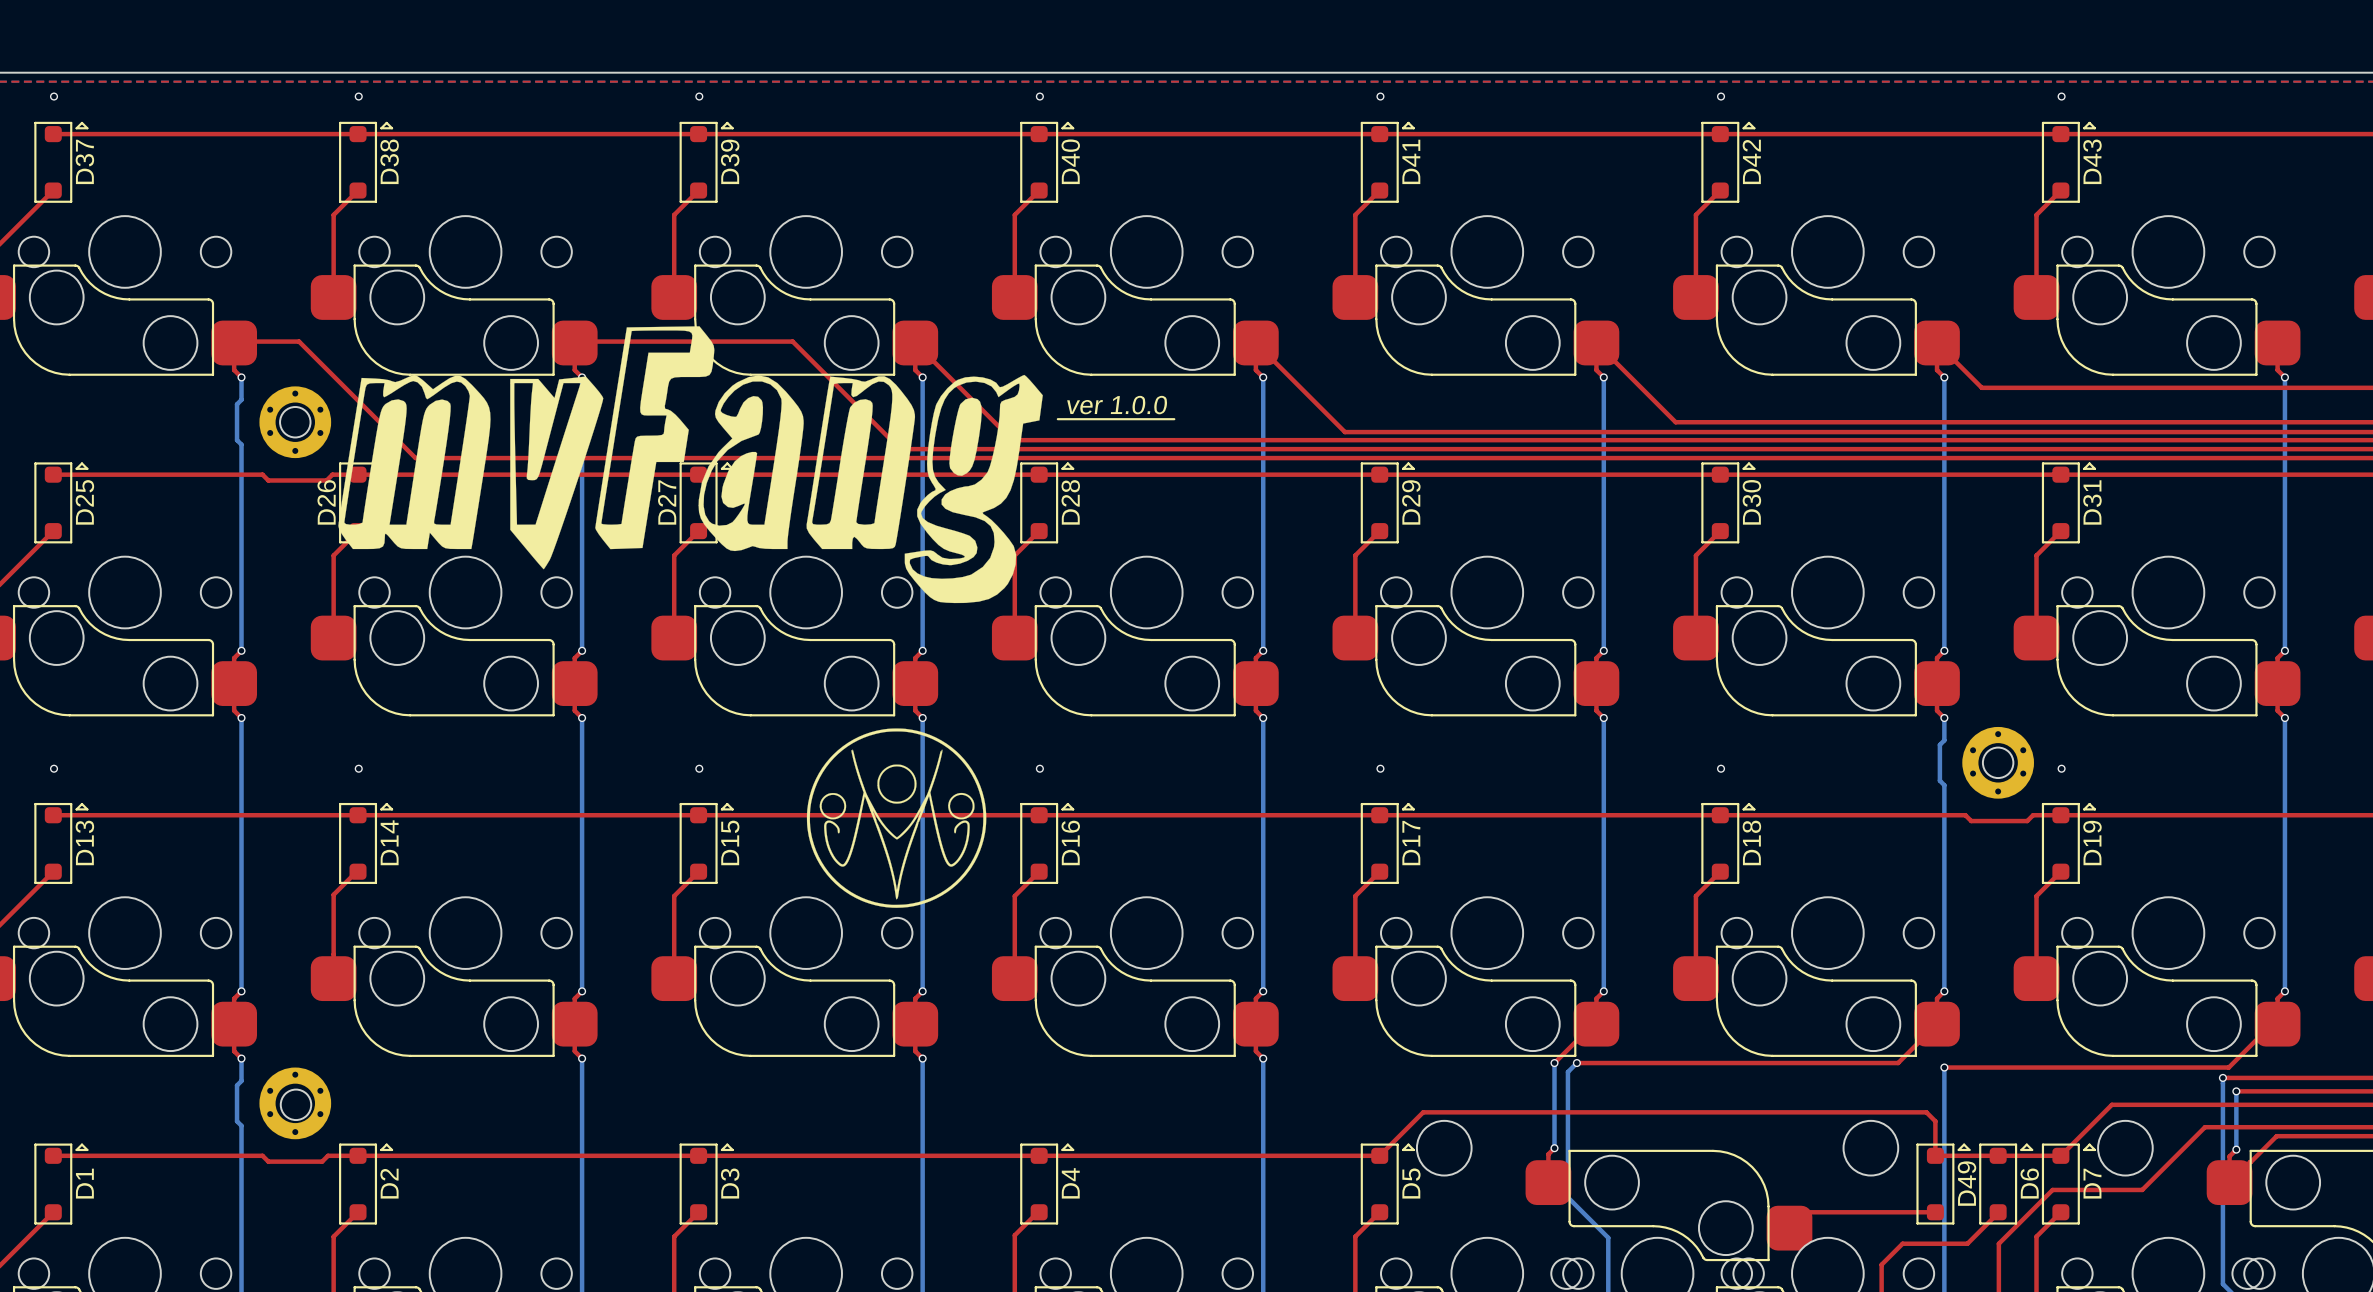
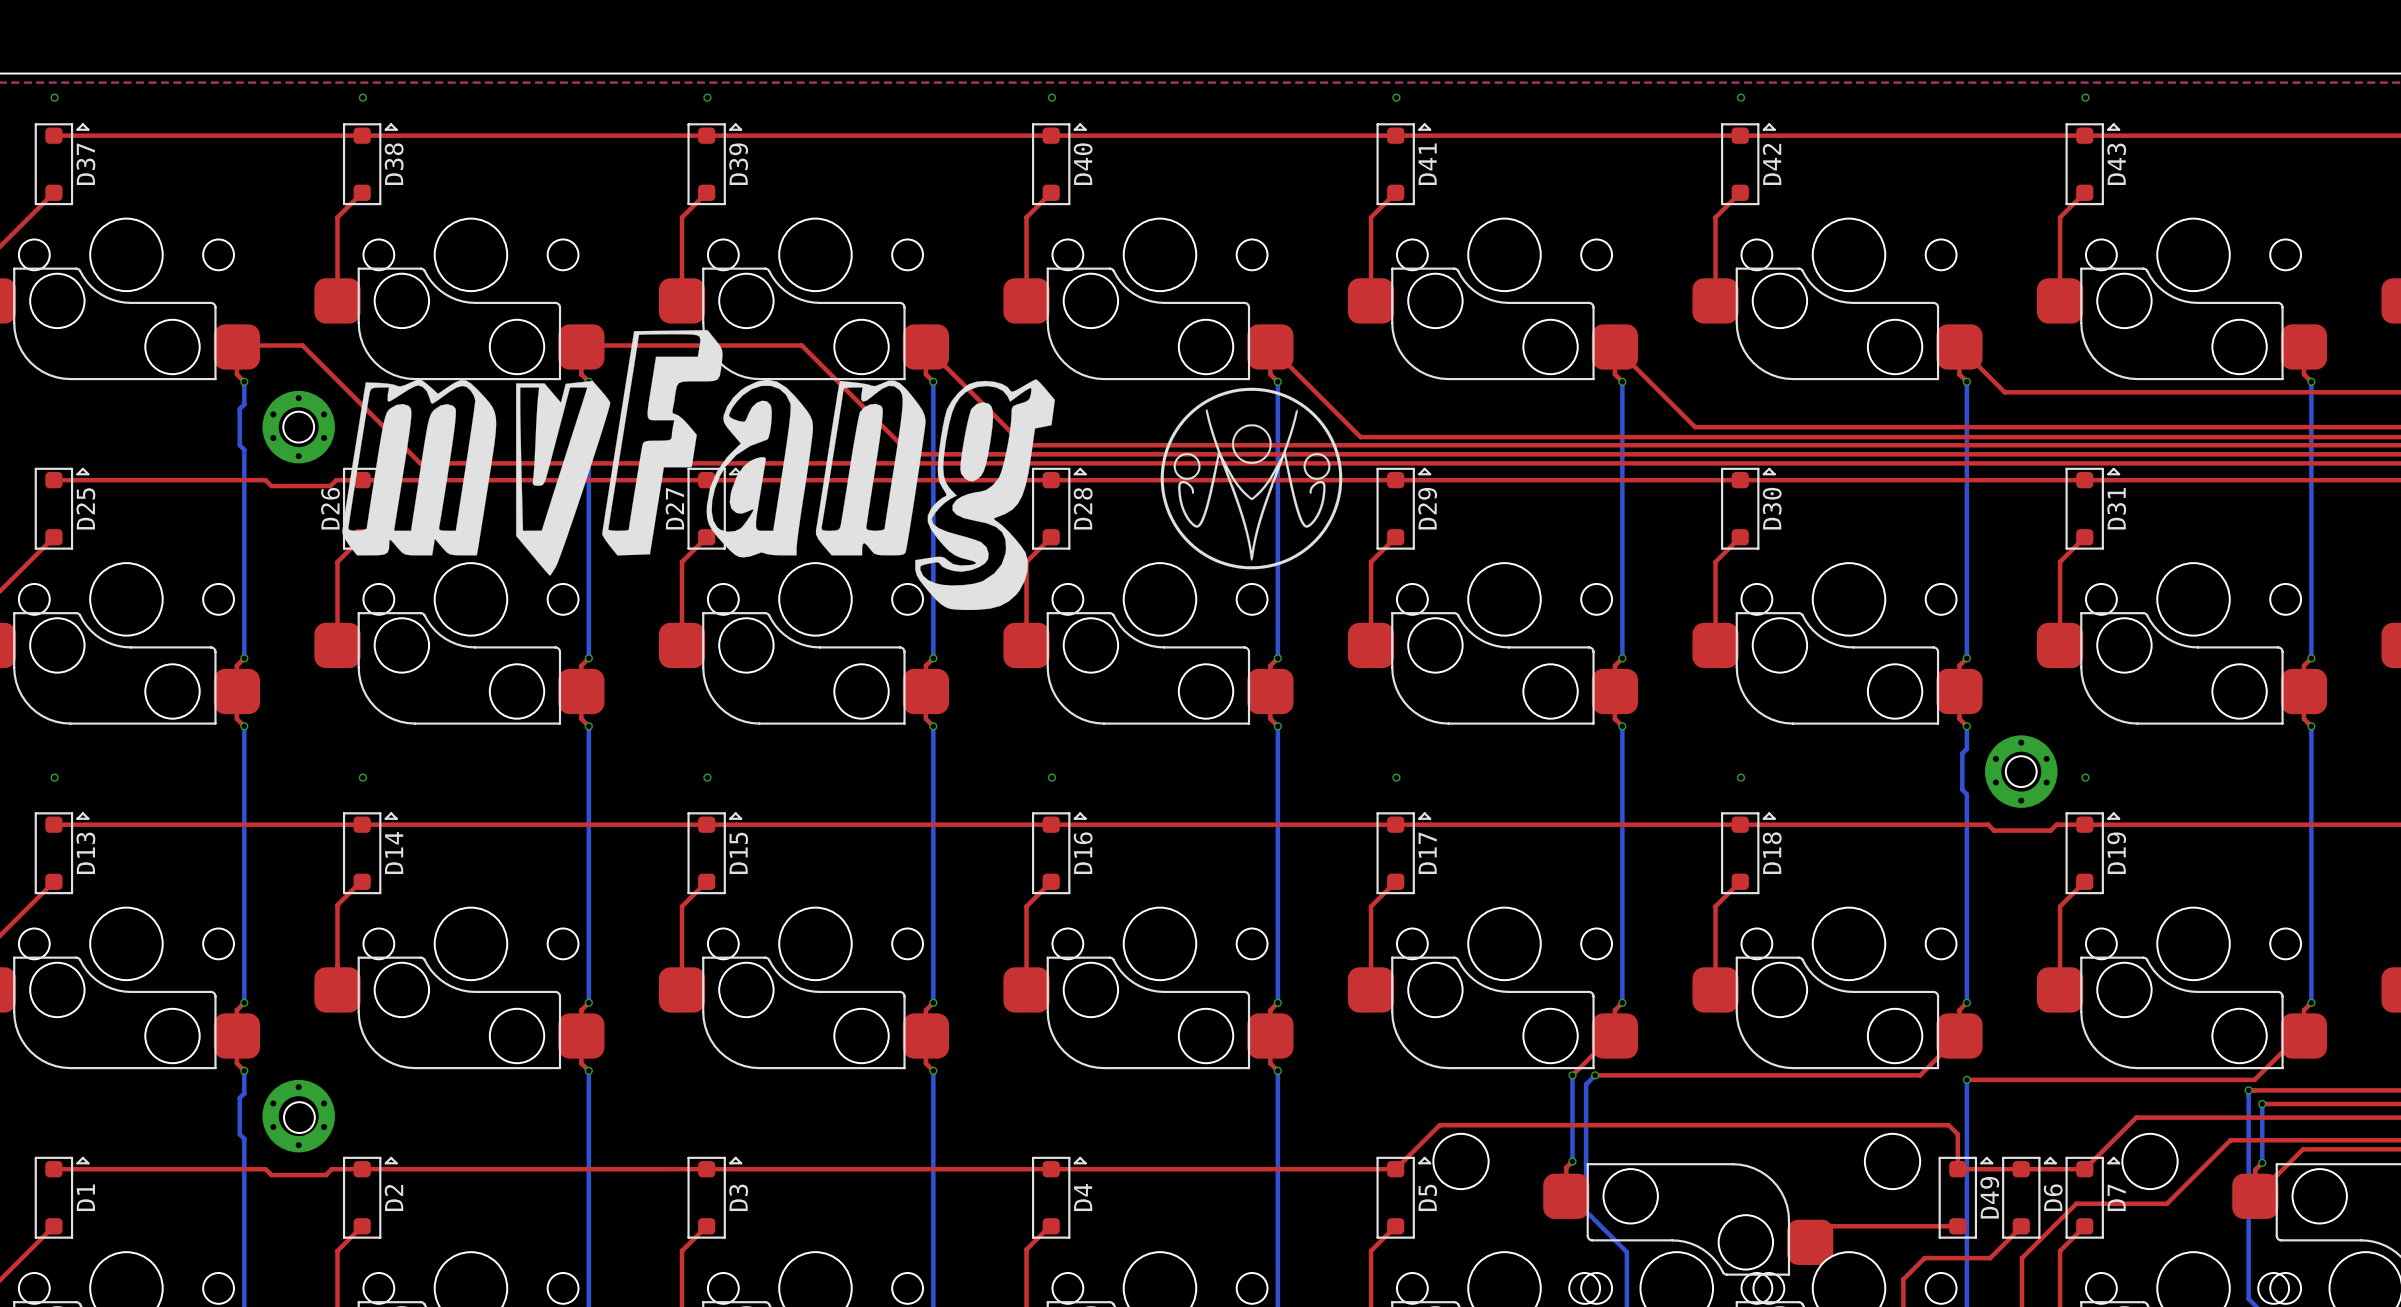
drawing: none -> [1160, 387, 1343, 570]
text: ver 1.0.0 (1117, 405) -> none
line: (1057, 419) (1174, 419) -> none
drawing: [806, 728, 987, 908] -> none

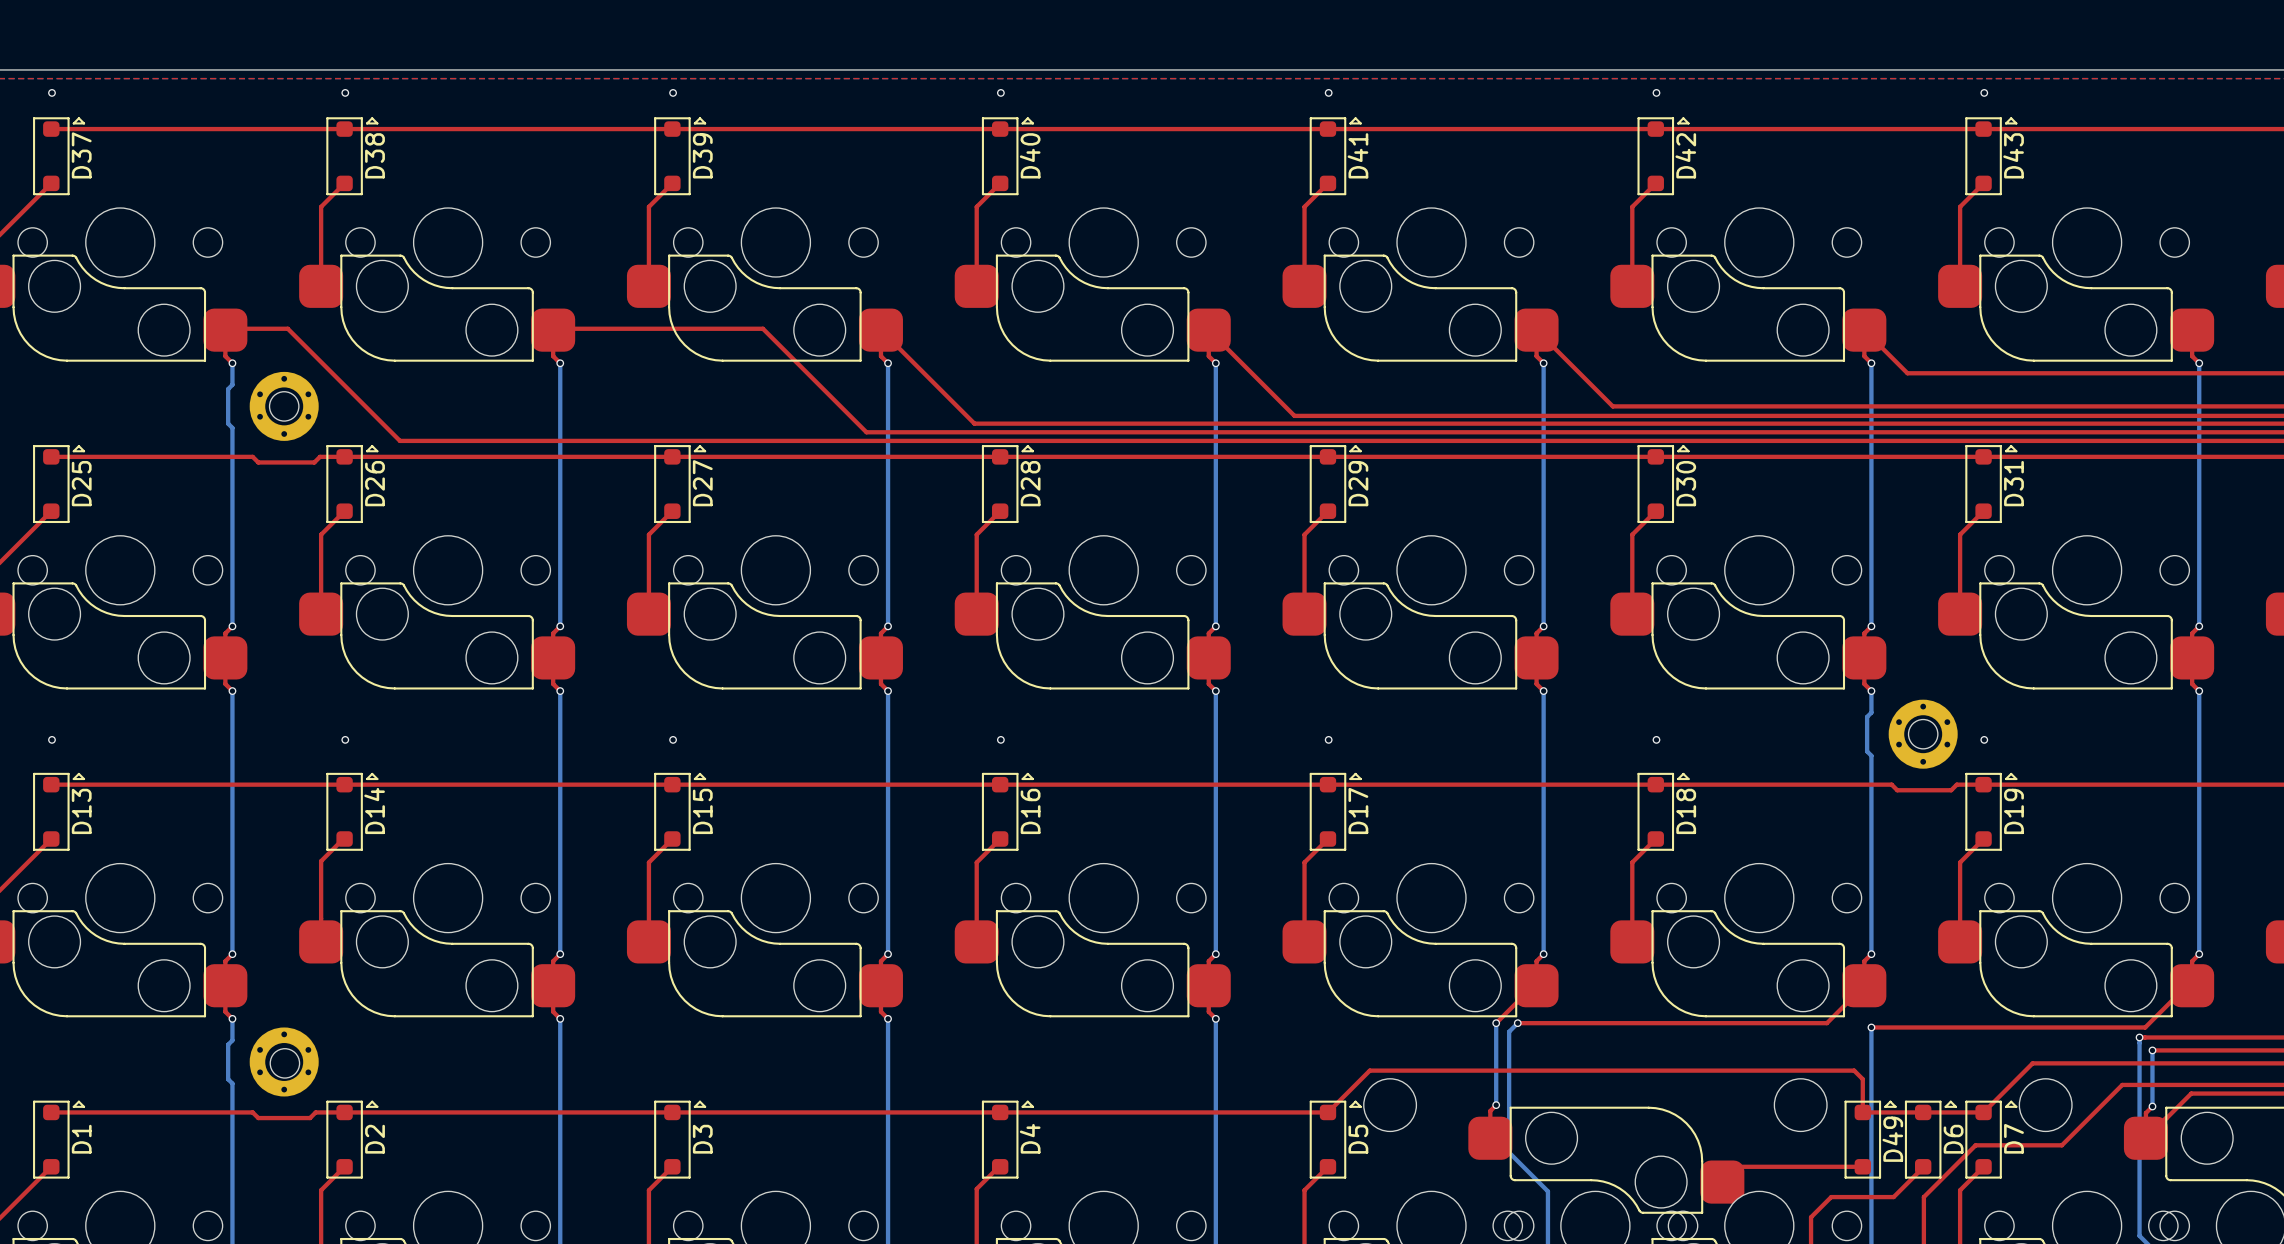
drawing: [342, 330, 1055, 611] -> none
drawing: [1160, 387, 1343, 570] -> none
D26 name position: D26 (330, 508) -> D26 (375, 483)
D27 name position: D27 (674, 508) -> D27 (702, 483)

